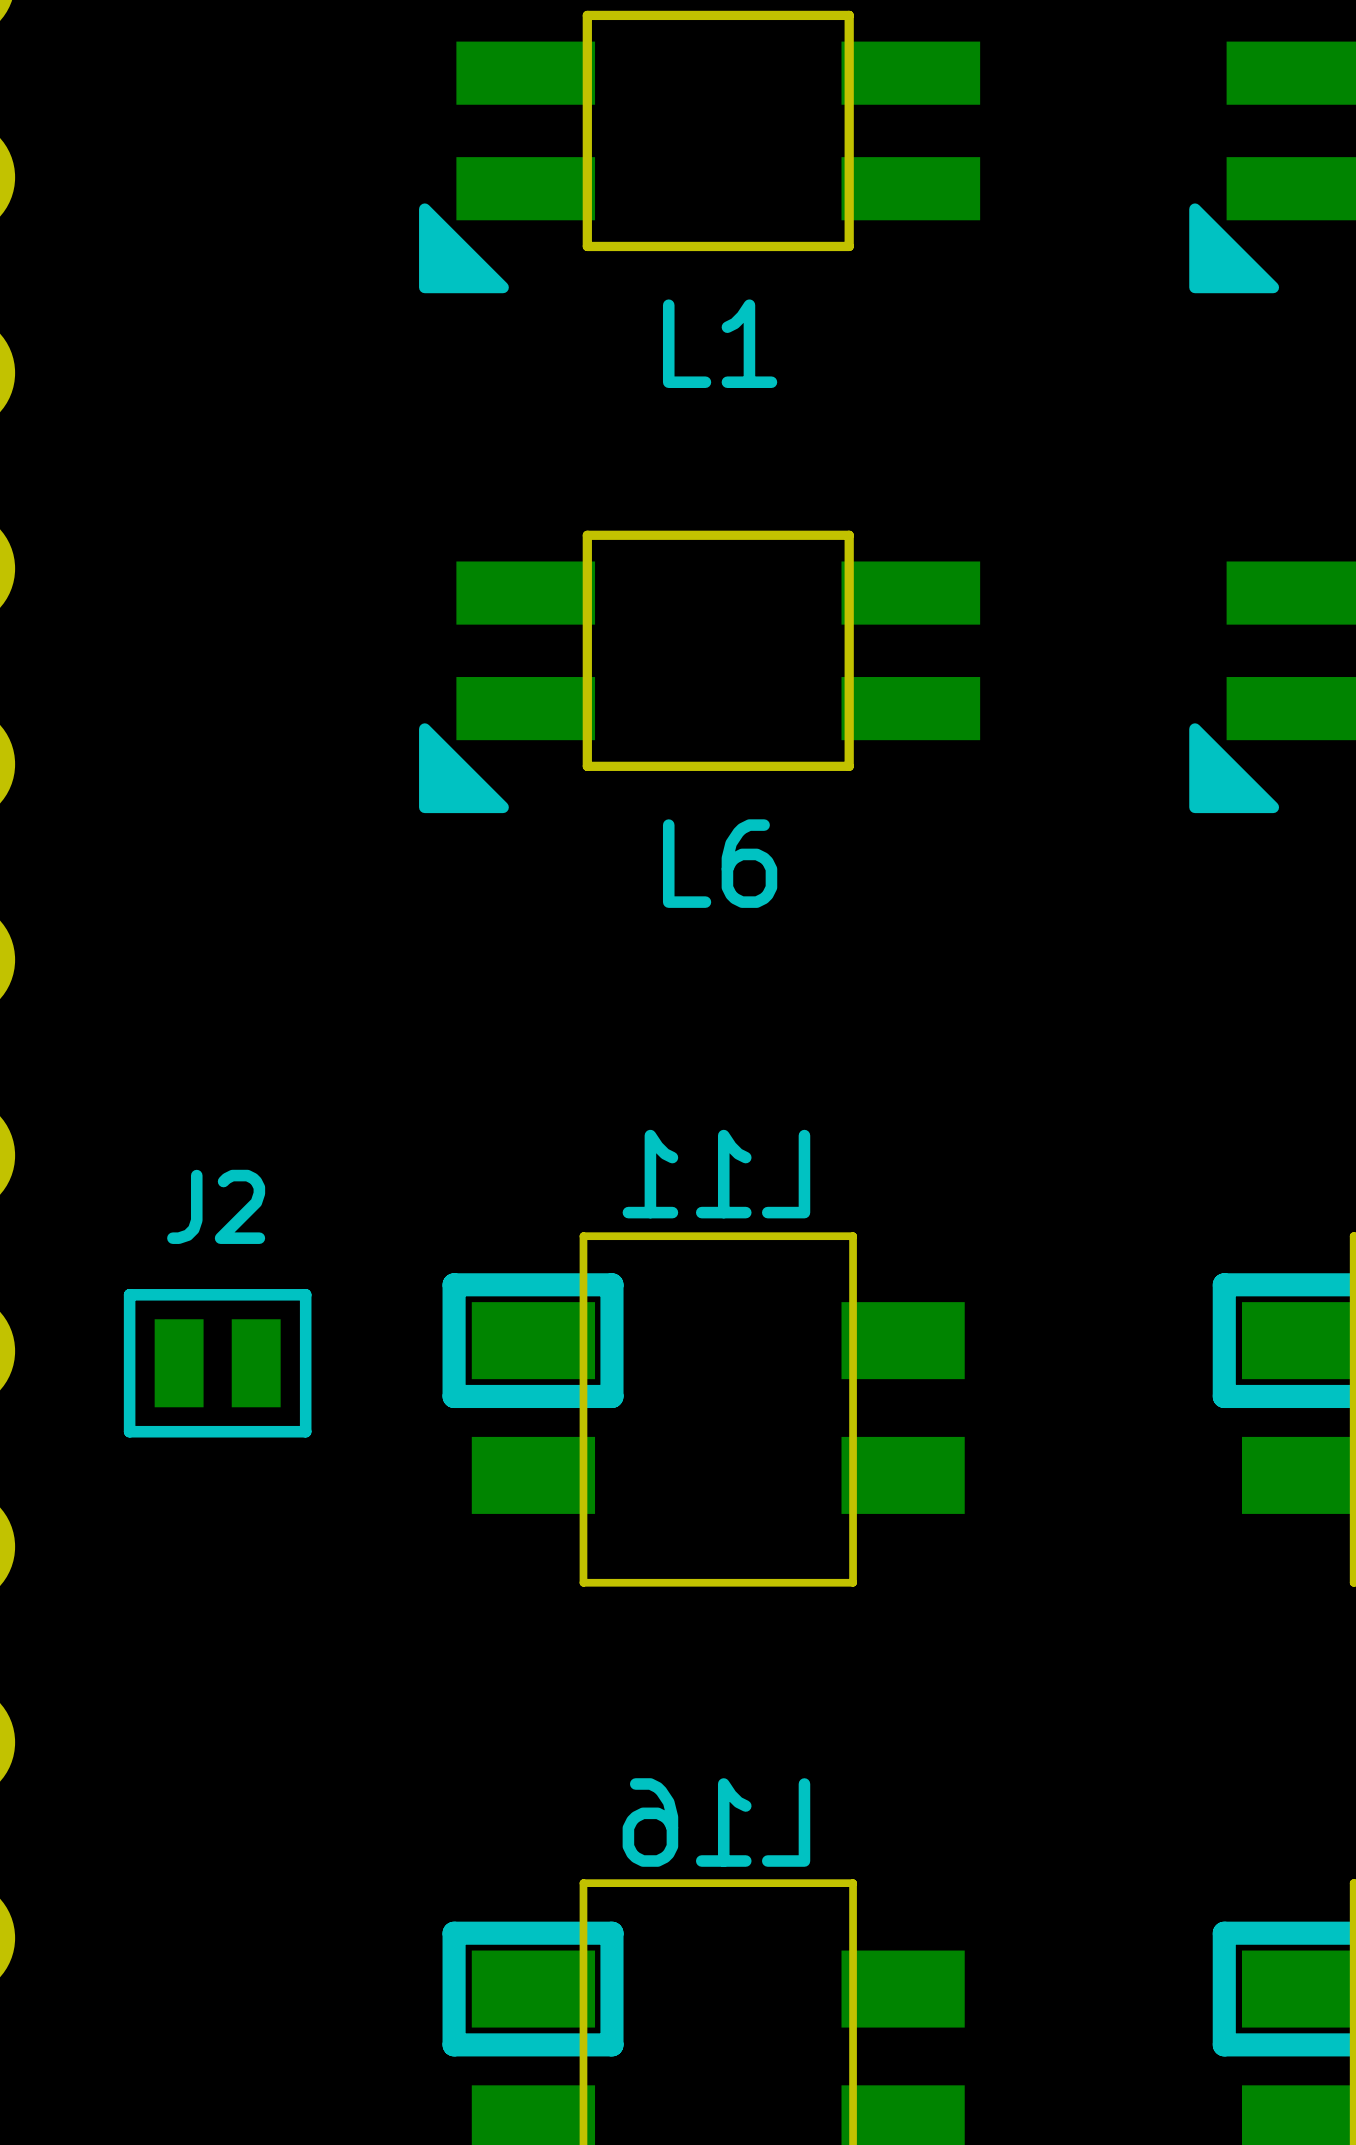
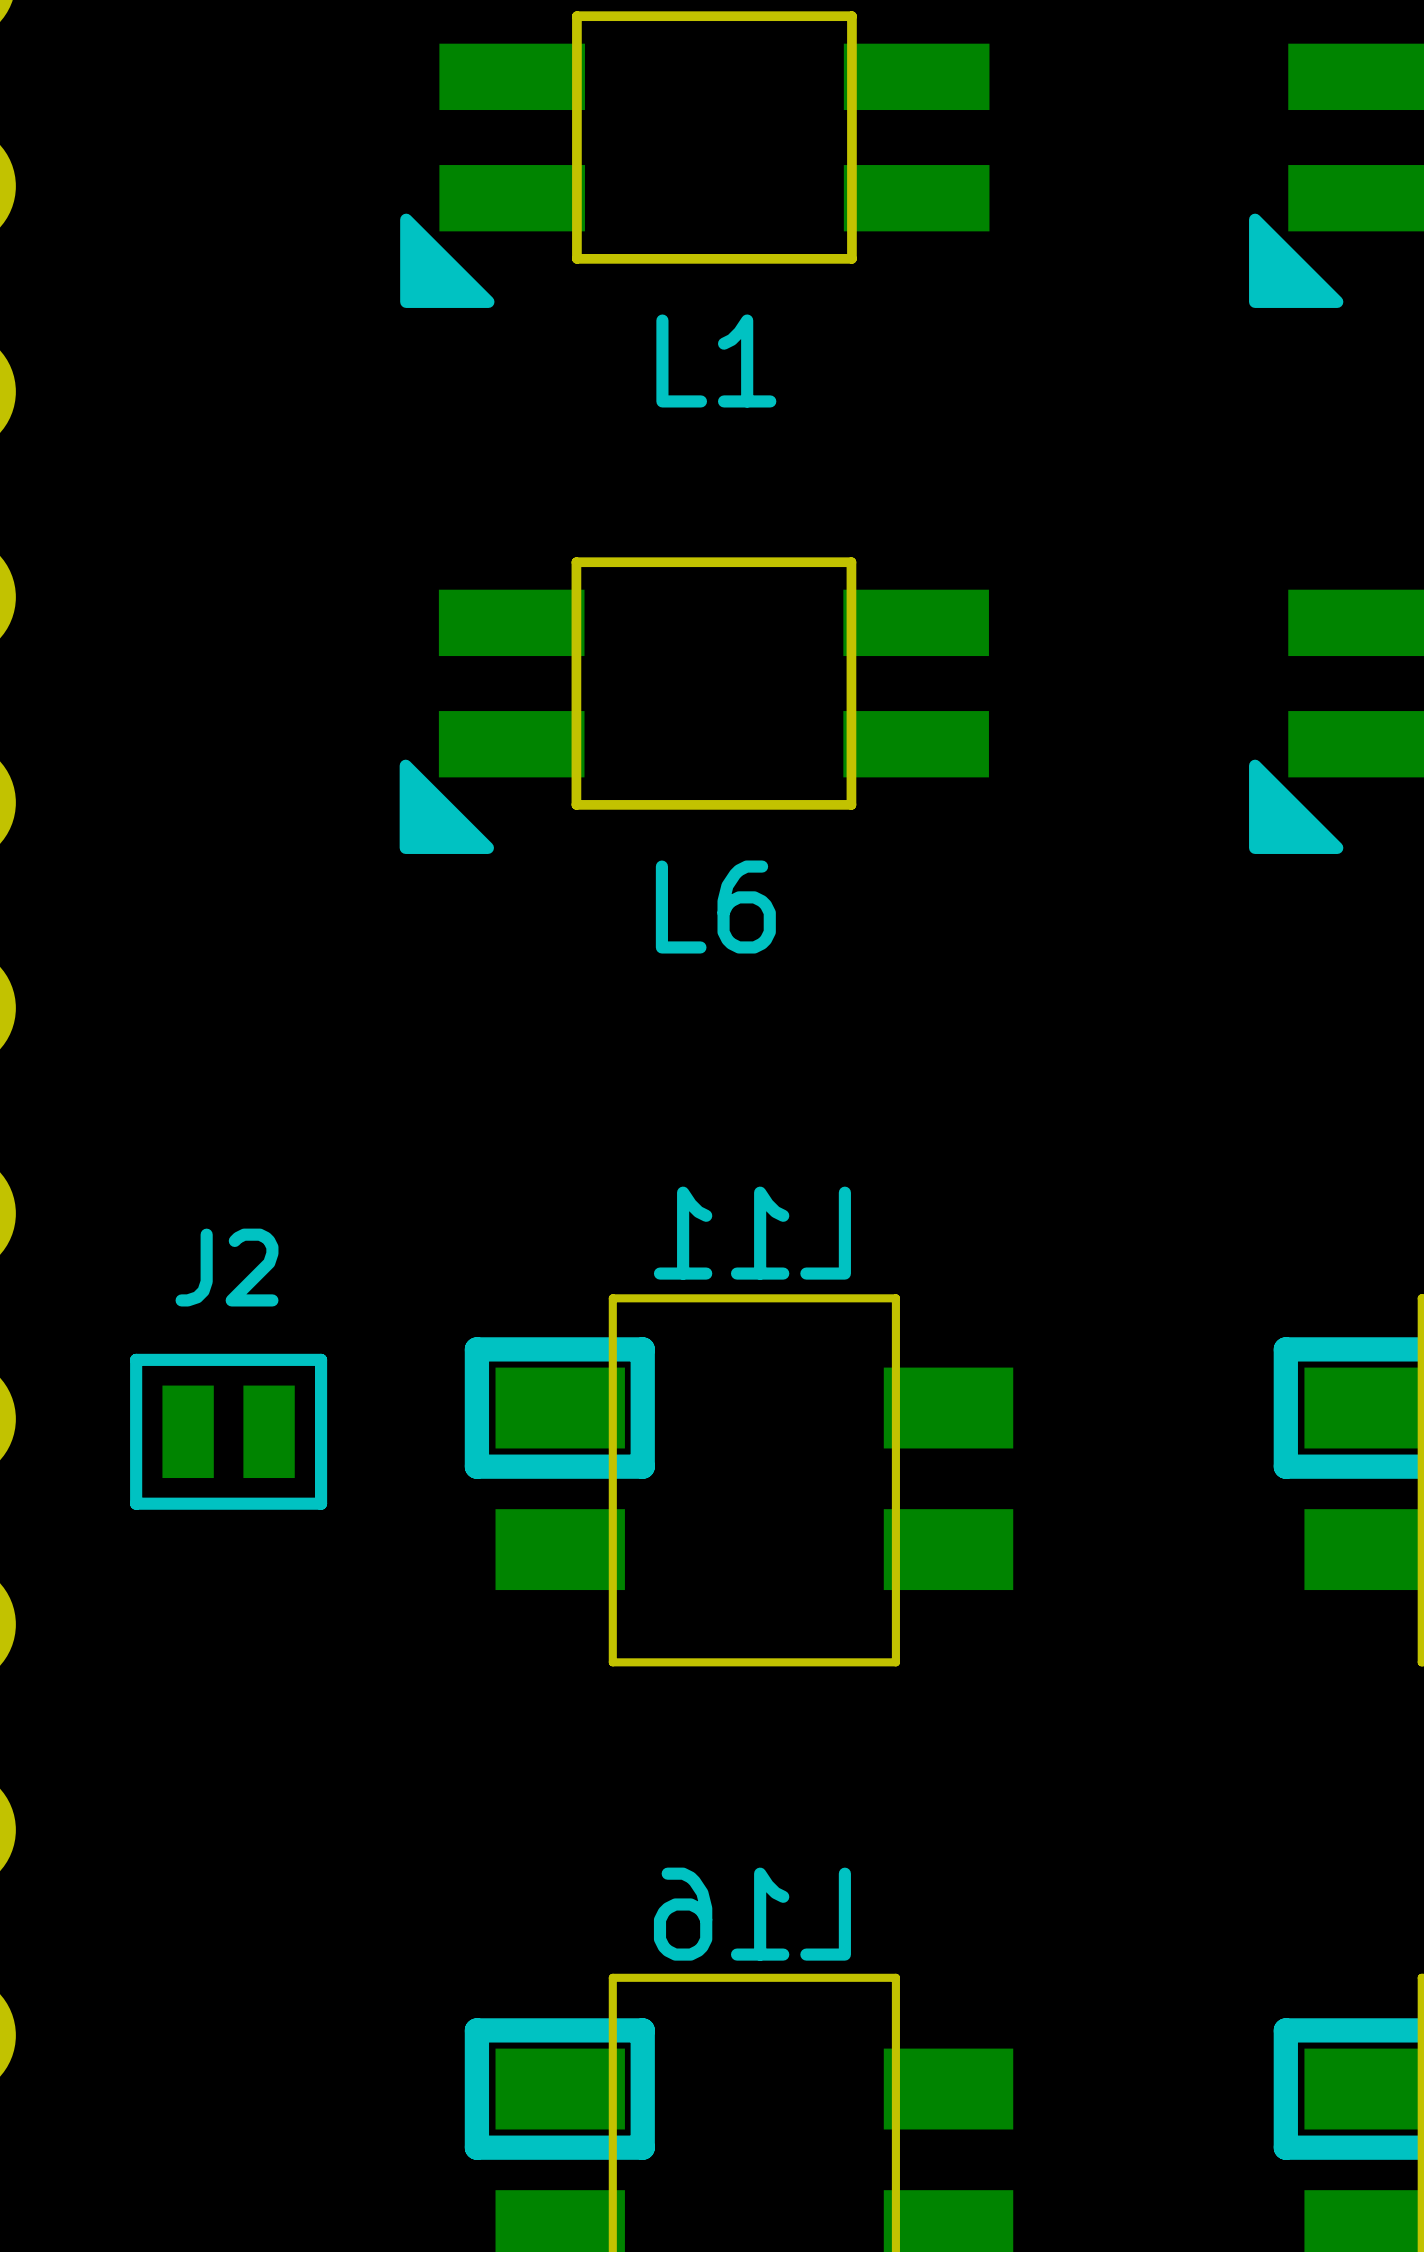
L1 position: (699, 152) -> (694, 159)
L6 position: (699, 671) -> (694, 705)

